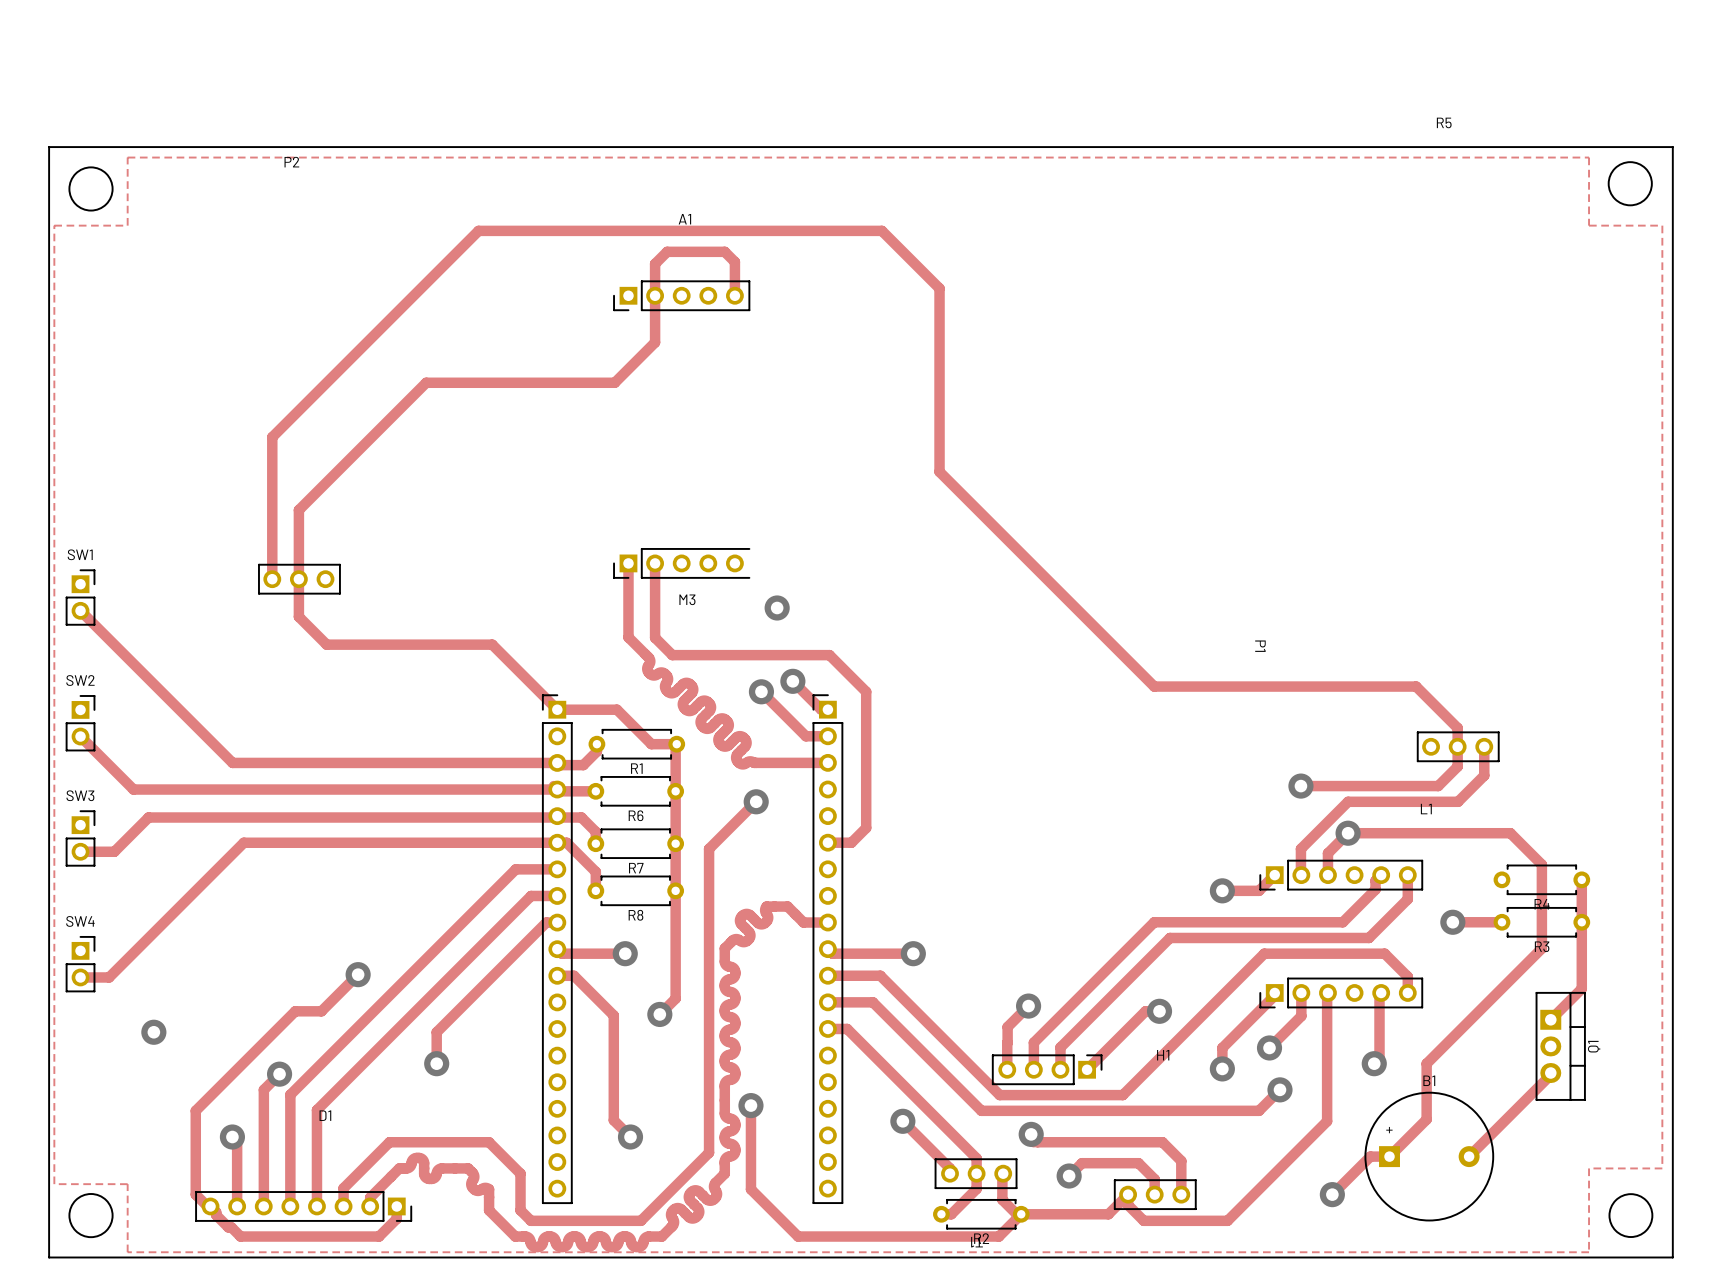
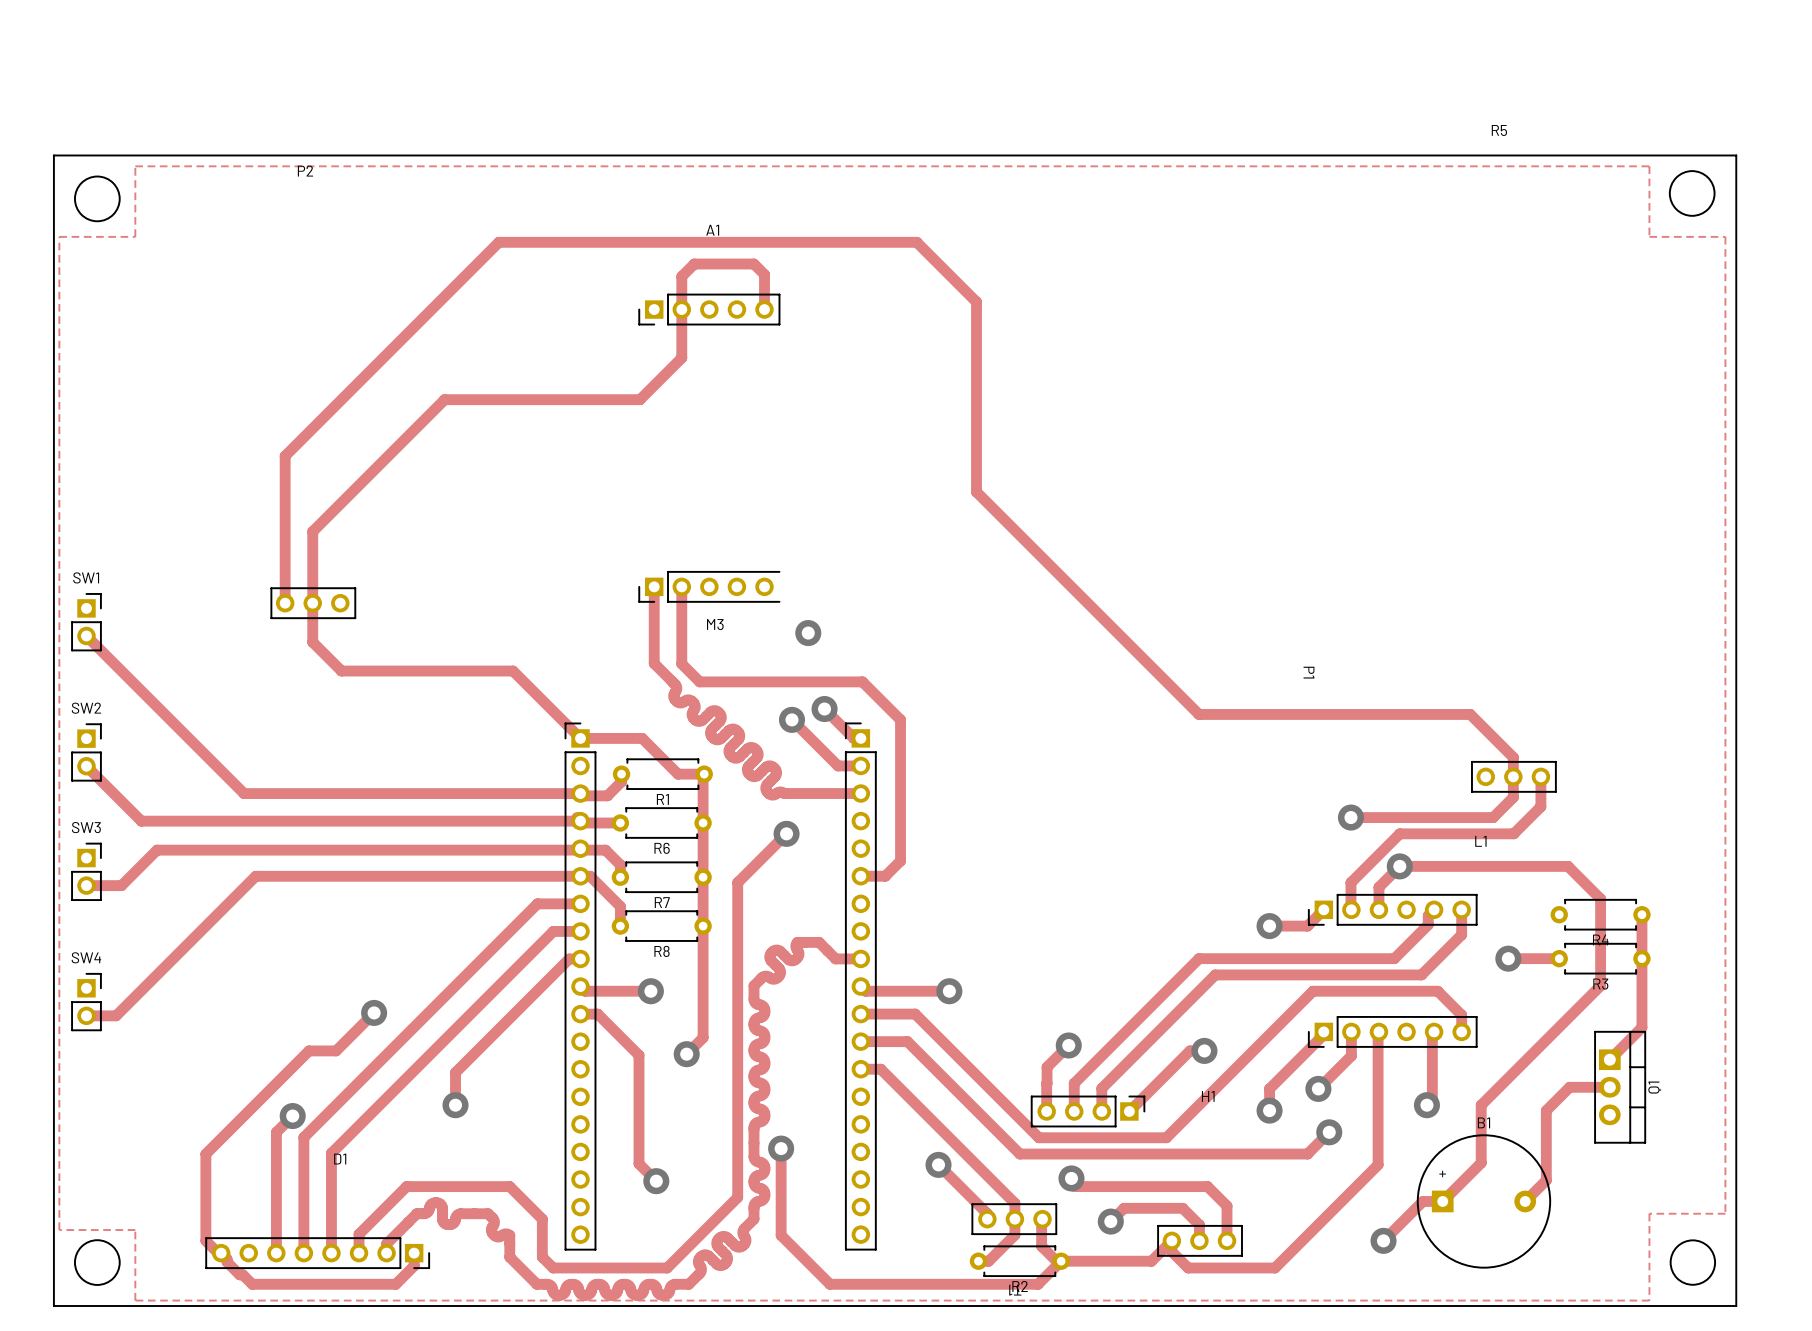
via: (153, 1032) -> none
track: (1550, 1074) (1489, 1136) -> (1609, 1087) (1569, 1087) (1546, 1110) (1546, 1180)
track: (232, 1137) (237, 1141) (237, 1206) -> none
via: (232, 1137) -> none

